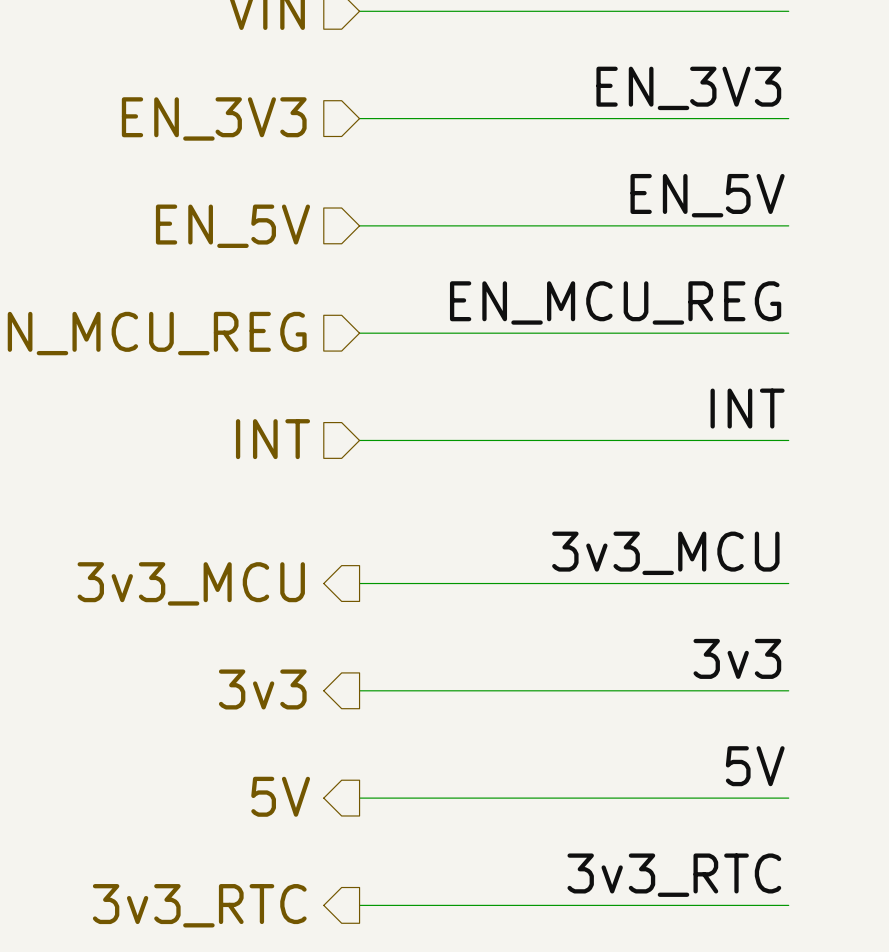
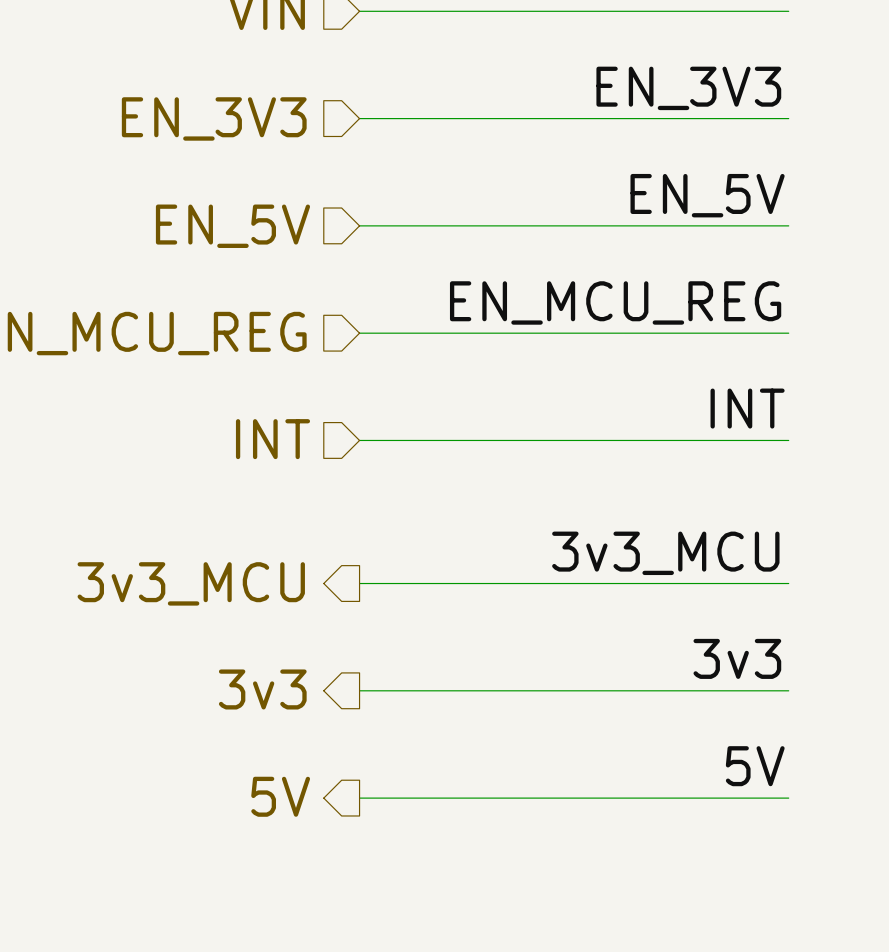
label: 3v3_RTC (674, 875) -> none
hierarchical label: 3v3_RTC (199, 905) -> none
wire: (359, 905) (788, 905) -> none

